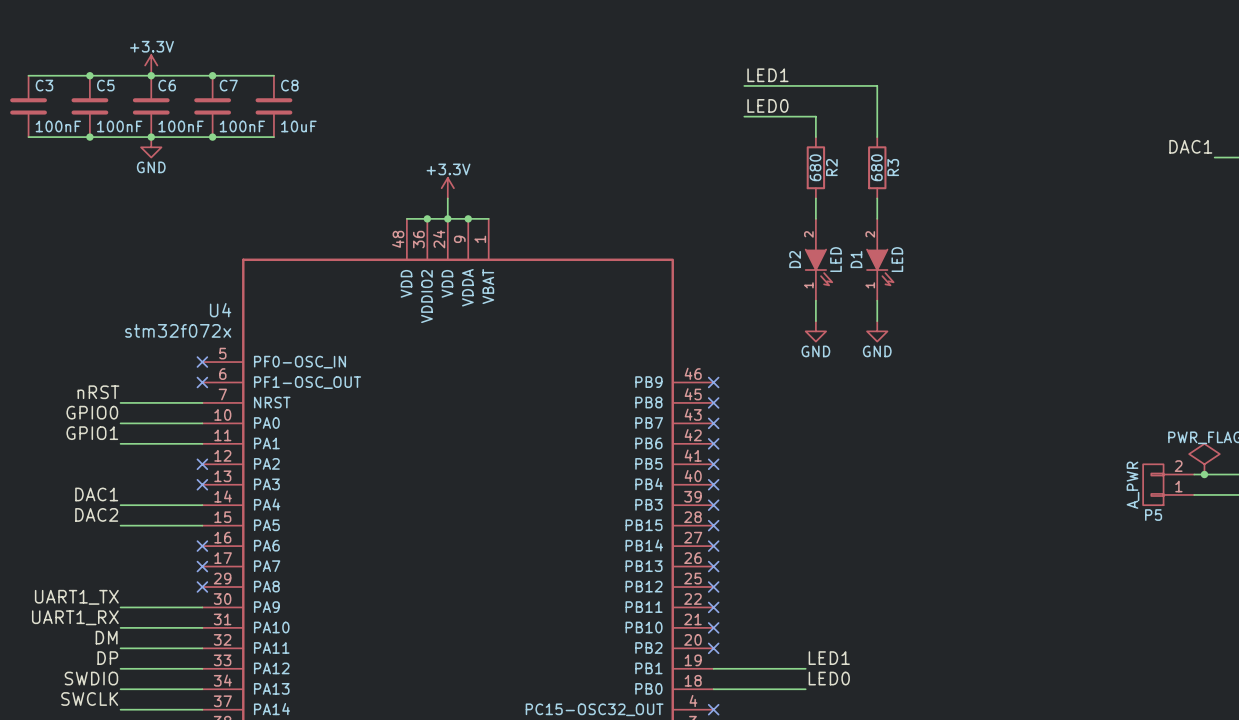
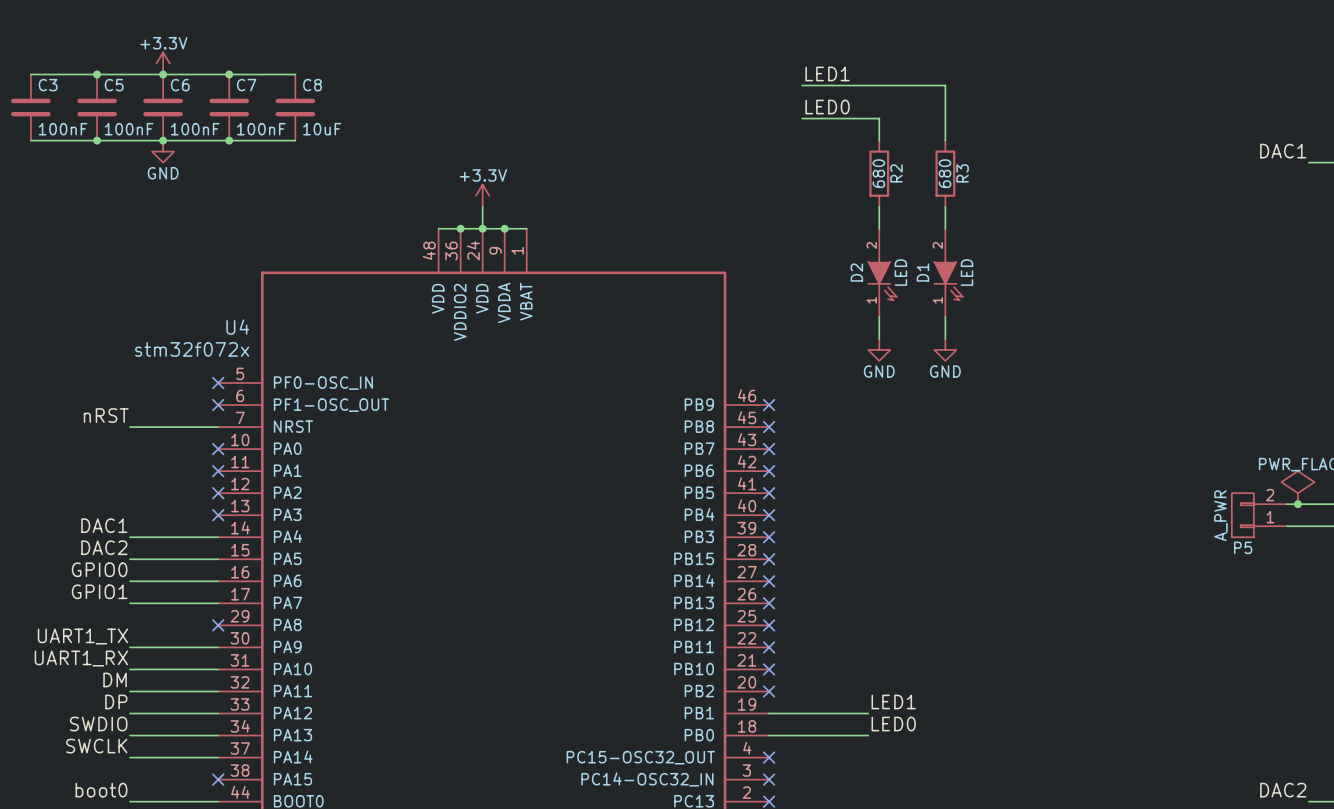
label position: GPIO0 (92, 412) -> GPIO0 (99, 569)
wire: (120, 423) (202, 423) -> (130, 603) (218, 603)
no-connect mark: none -> (218, 449)
label position: GPIO1 (92, 433) -> GPIO1 (99, 591)
wire: (120, 443) (202, 443) -> (130, 581) (218, 581)
no-connect mark: none -> (218, 471)
no-connect mark: (202, 546) -> none
no-connect mark: (202, 566) -> none

